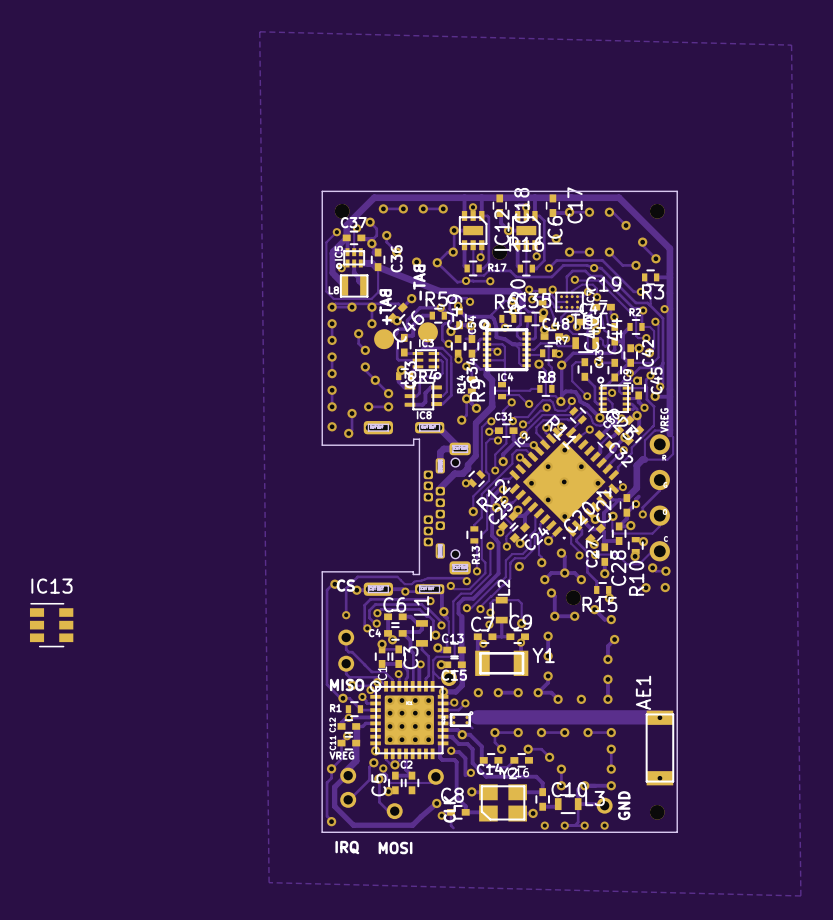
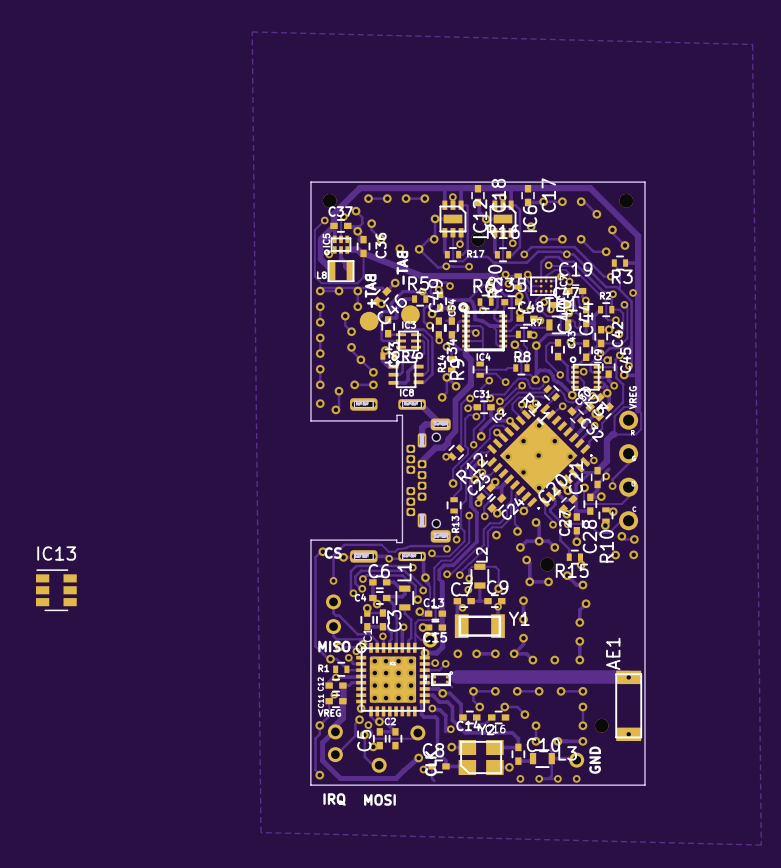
part position: (657, 812) -> (601, 725)

